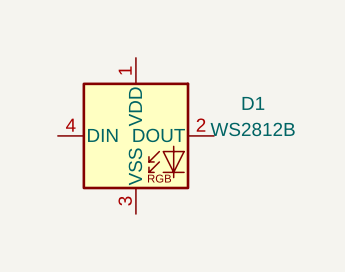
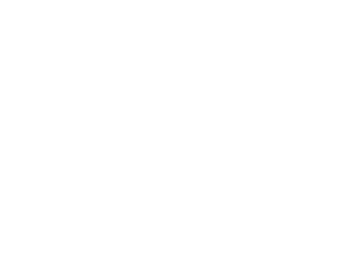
D1: WS2812B (135, 135) -> none

